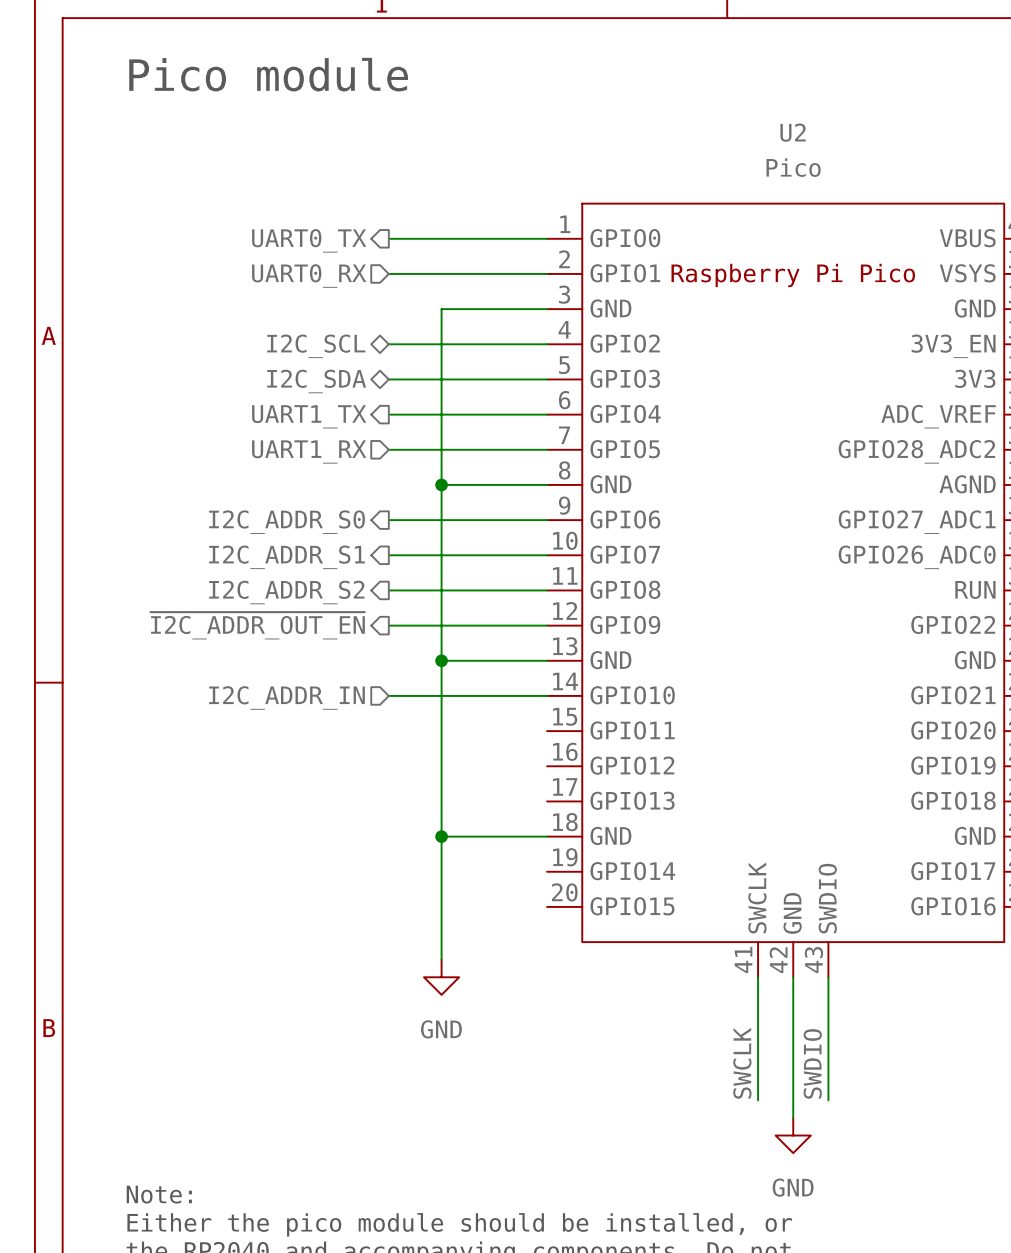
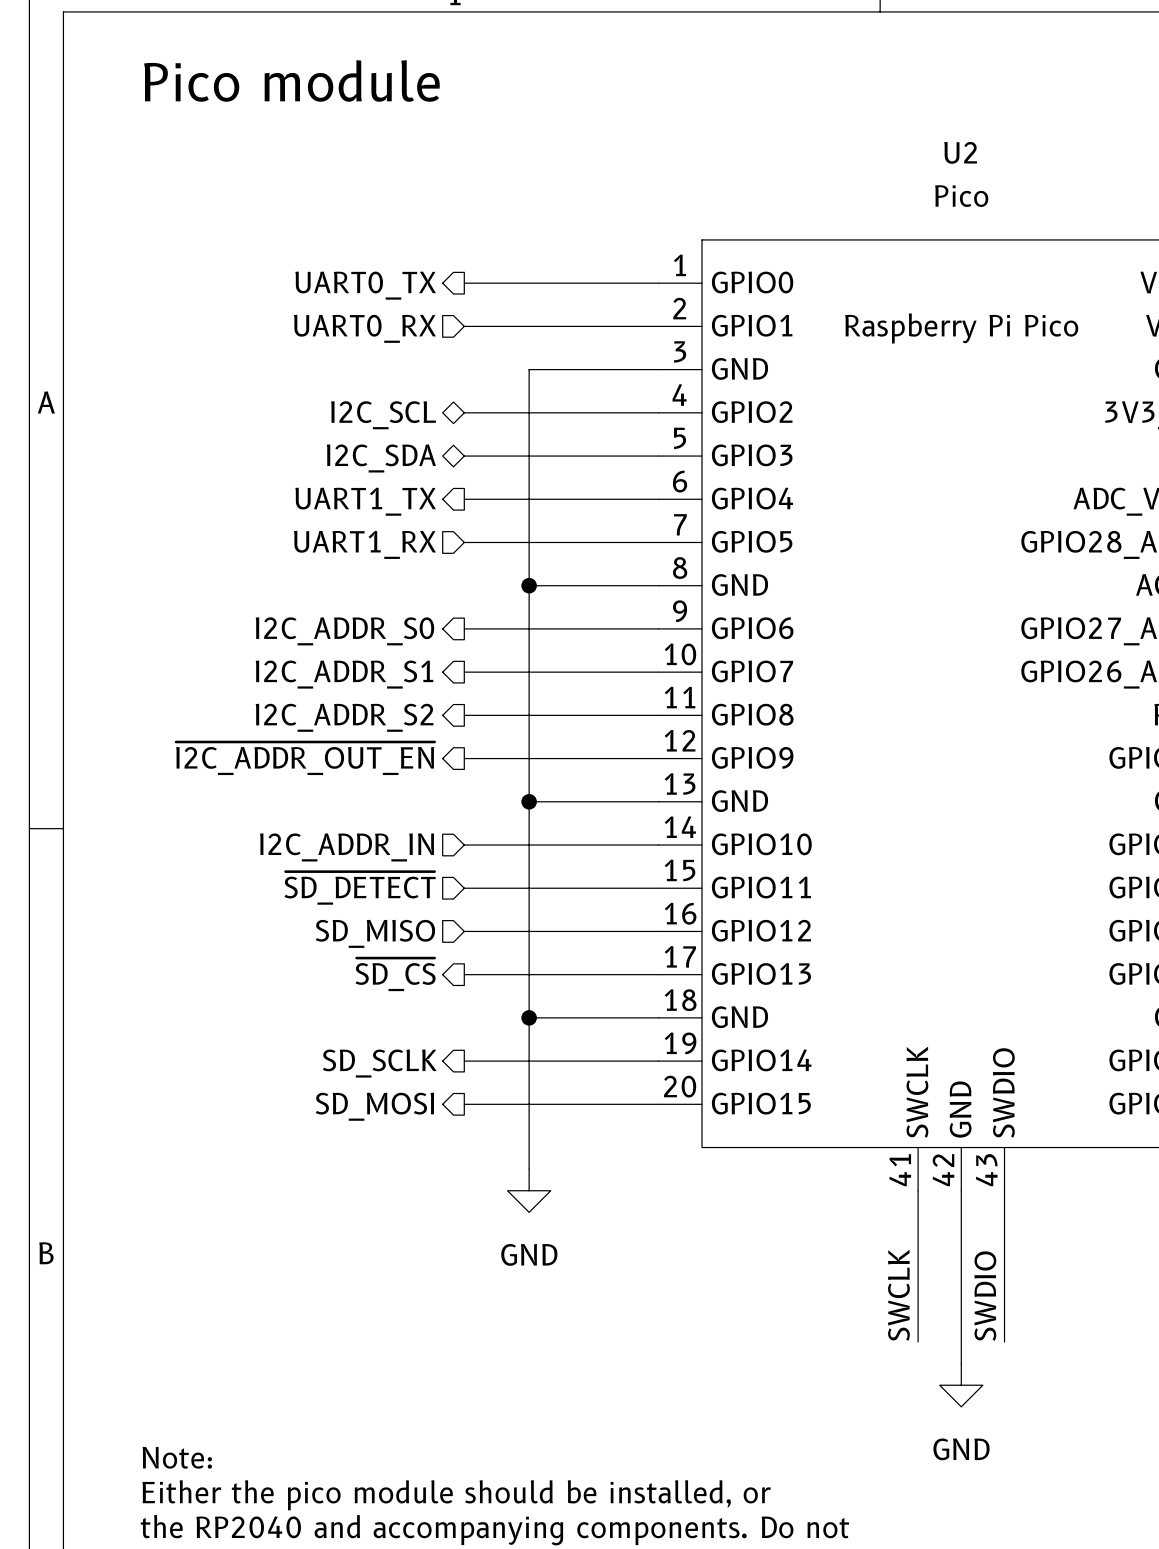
hierarchical label: none -> ~{SD_DETECT} (360, 888)
wire: none -> (464, 888) (658, 888)
wire: none -> (464, 931) (658, 931)
hierarchical label: none -> SD_MISO (375, 933)
hierarchical label: none -> ~{SD_CS} (395, 974)
wire: none -> (464, 974) (658, 974)
wire: none -> (464, 1061) (658, 1061)
hierarchical label: none -> SD_SCLK (379, 1063)
wire: none -> (464, 1104) (658, 1104)
hierarchical label: none -> SD_MOSI (374, 1106)

